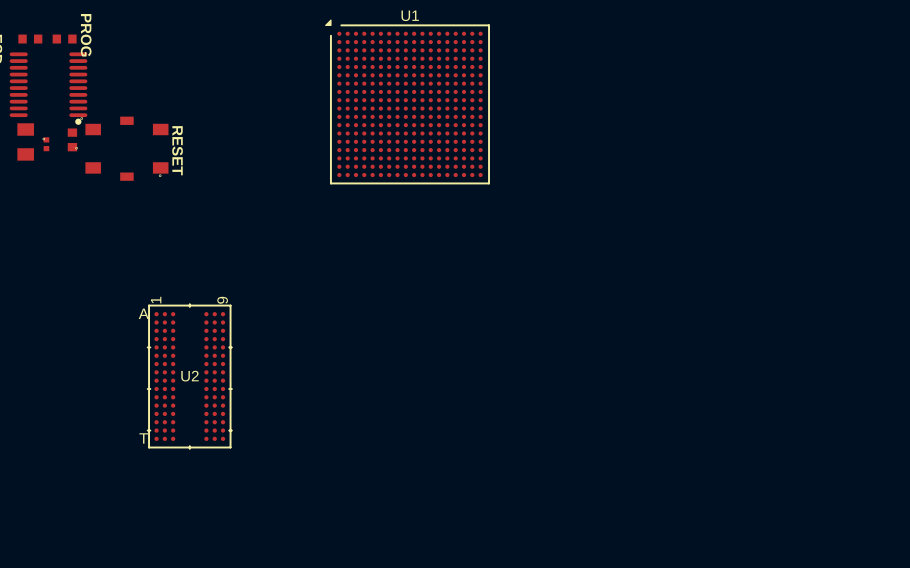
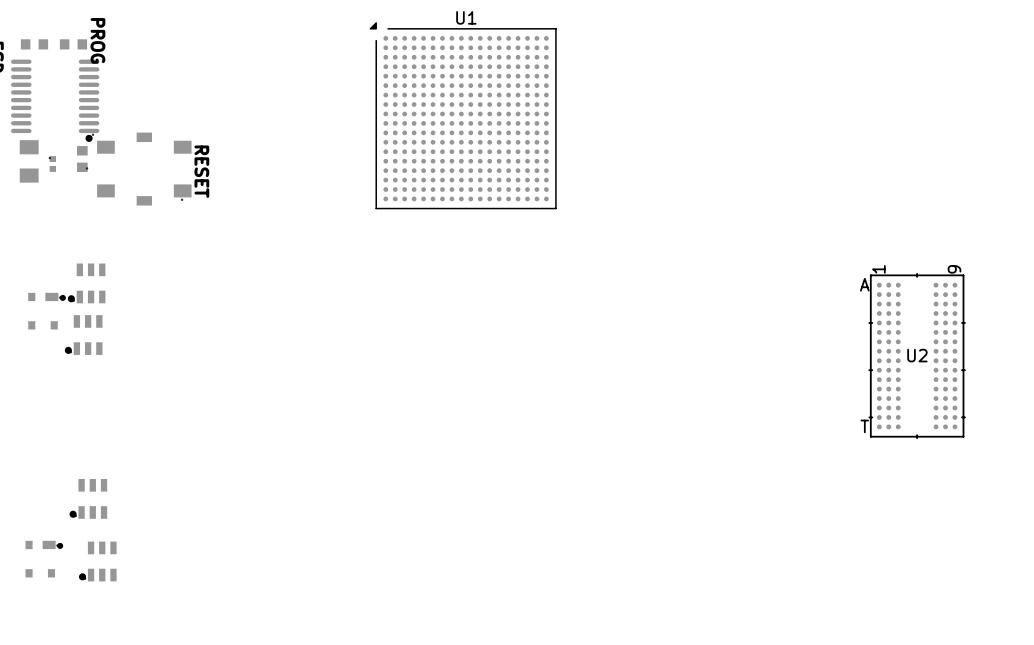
part: none -> (86, 283)
part: none -> (47, 311)
part: none -> (83, 335)
U2 position: (189, 376) -> (917, 356)
part: none -> (88, 498)
part: none -> (44, 559)
part: none -> (97, 561)

